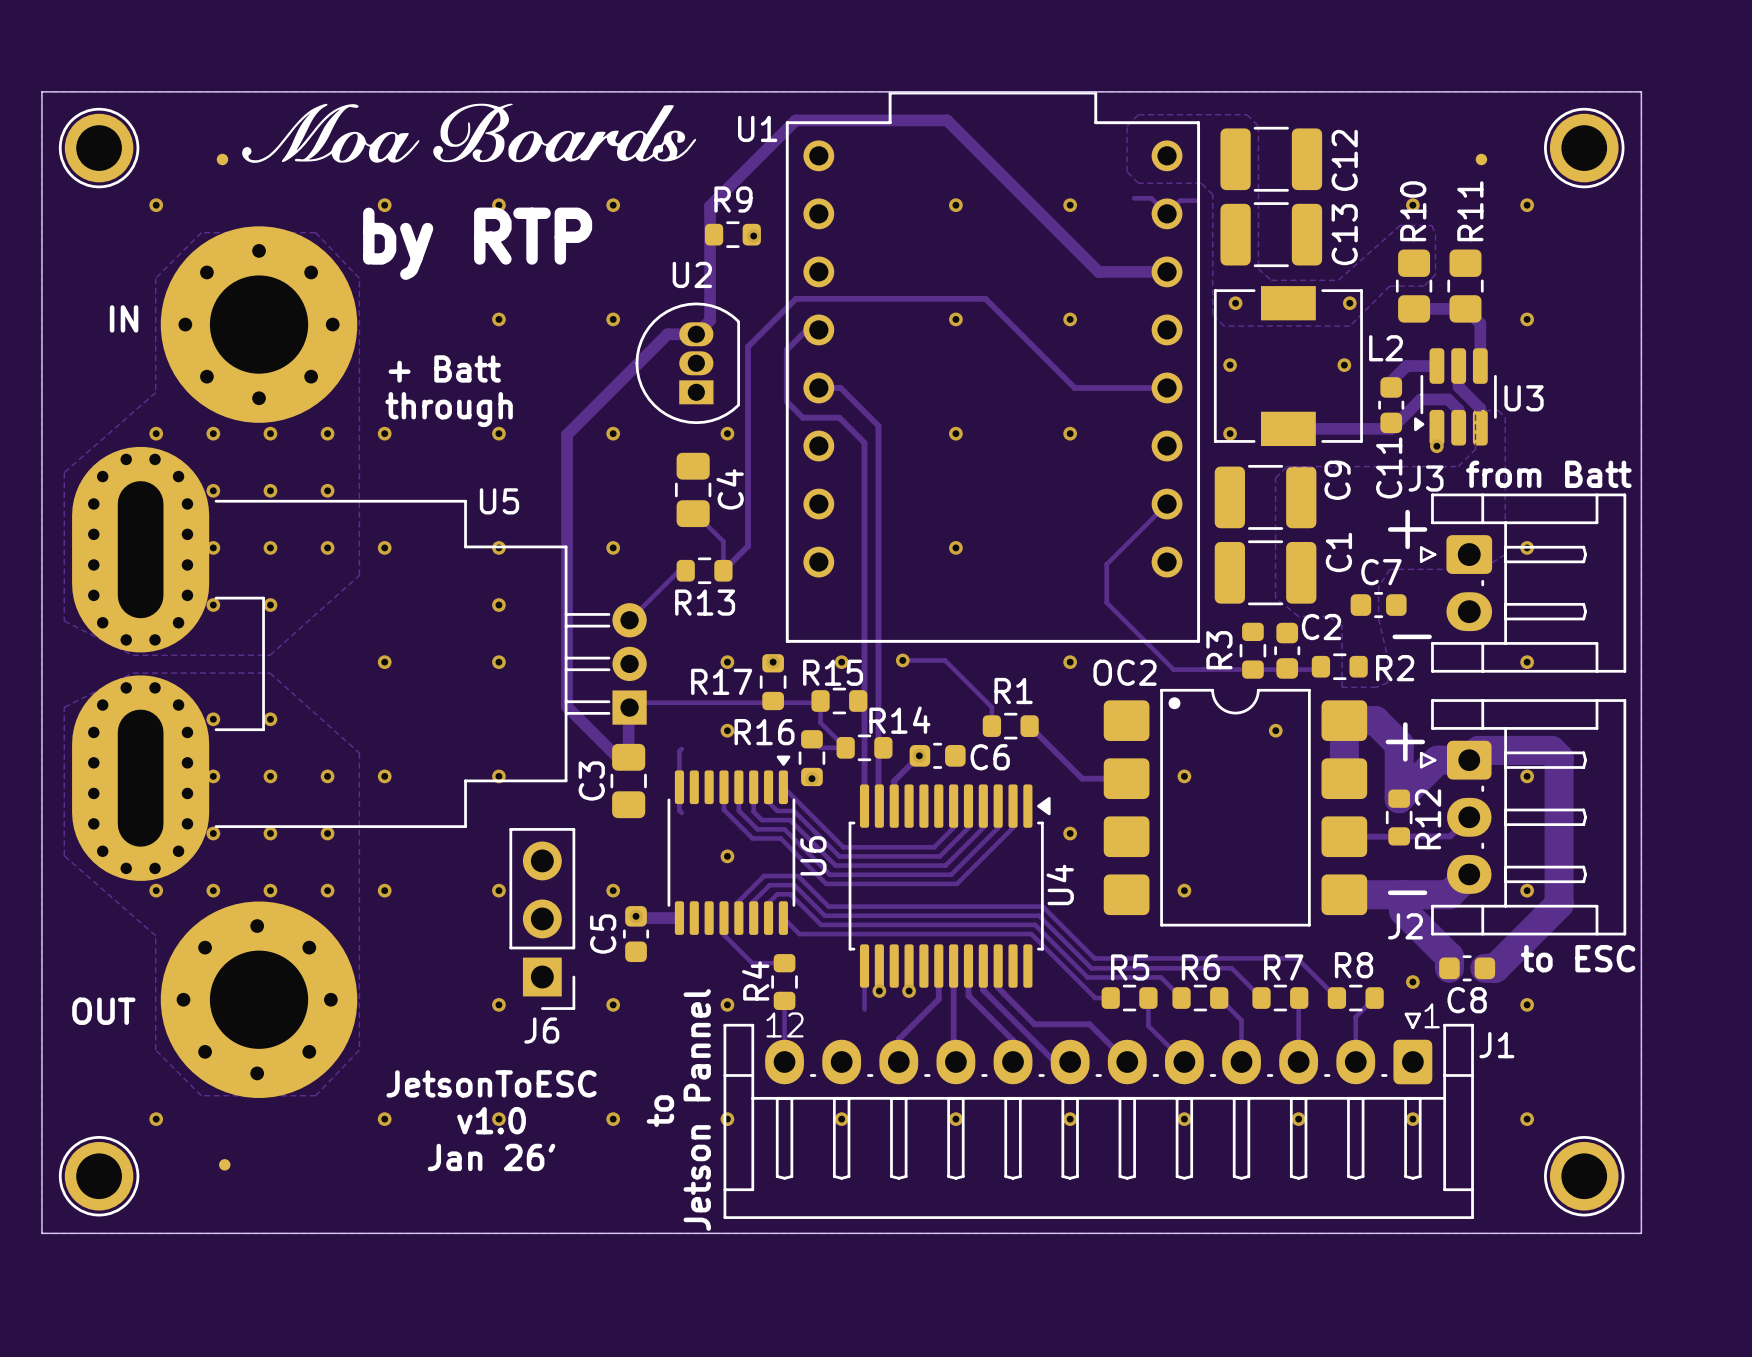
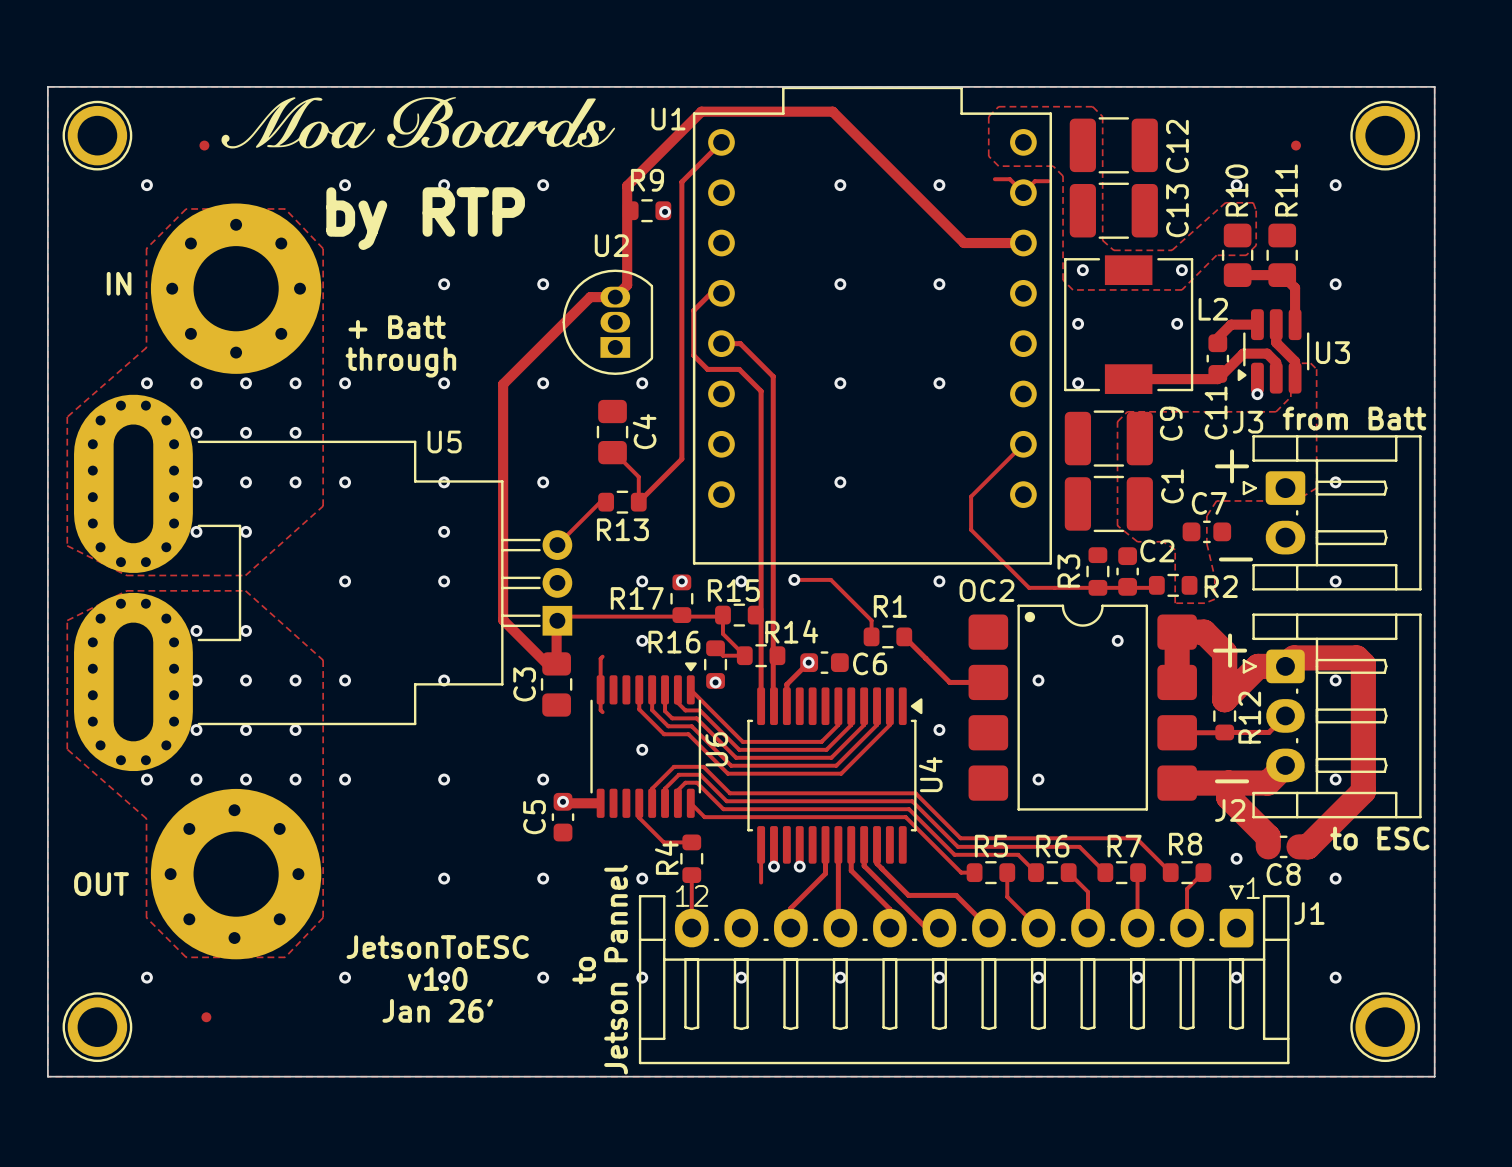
track: (1167, 387) (1074, 387) (985, 298) (795, 298) (747, 346) (747, 546) -> (721, 142) (681, 182) (681, 459) (660, 480)
J6: (542, 918) -> none

